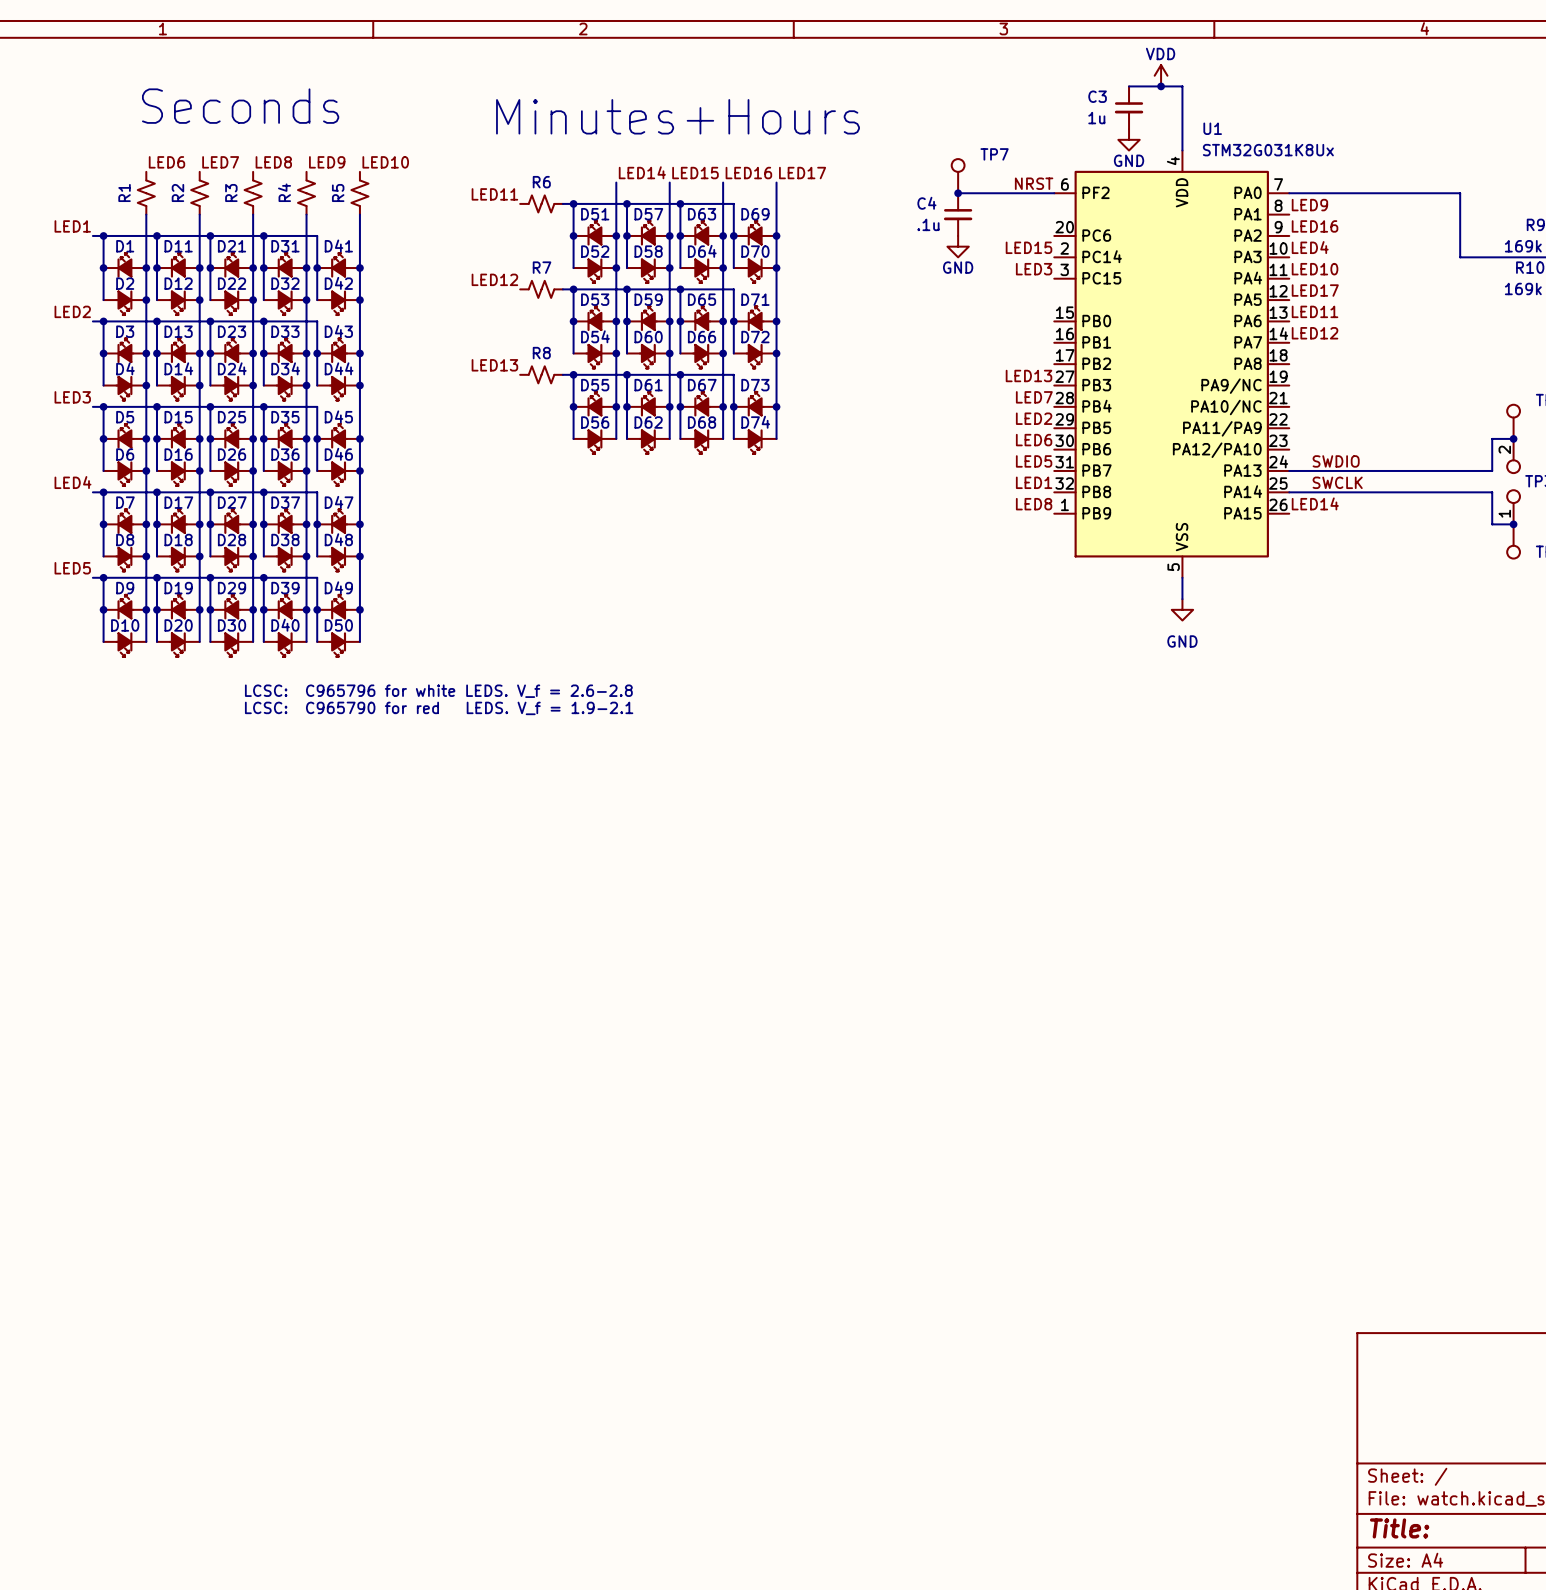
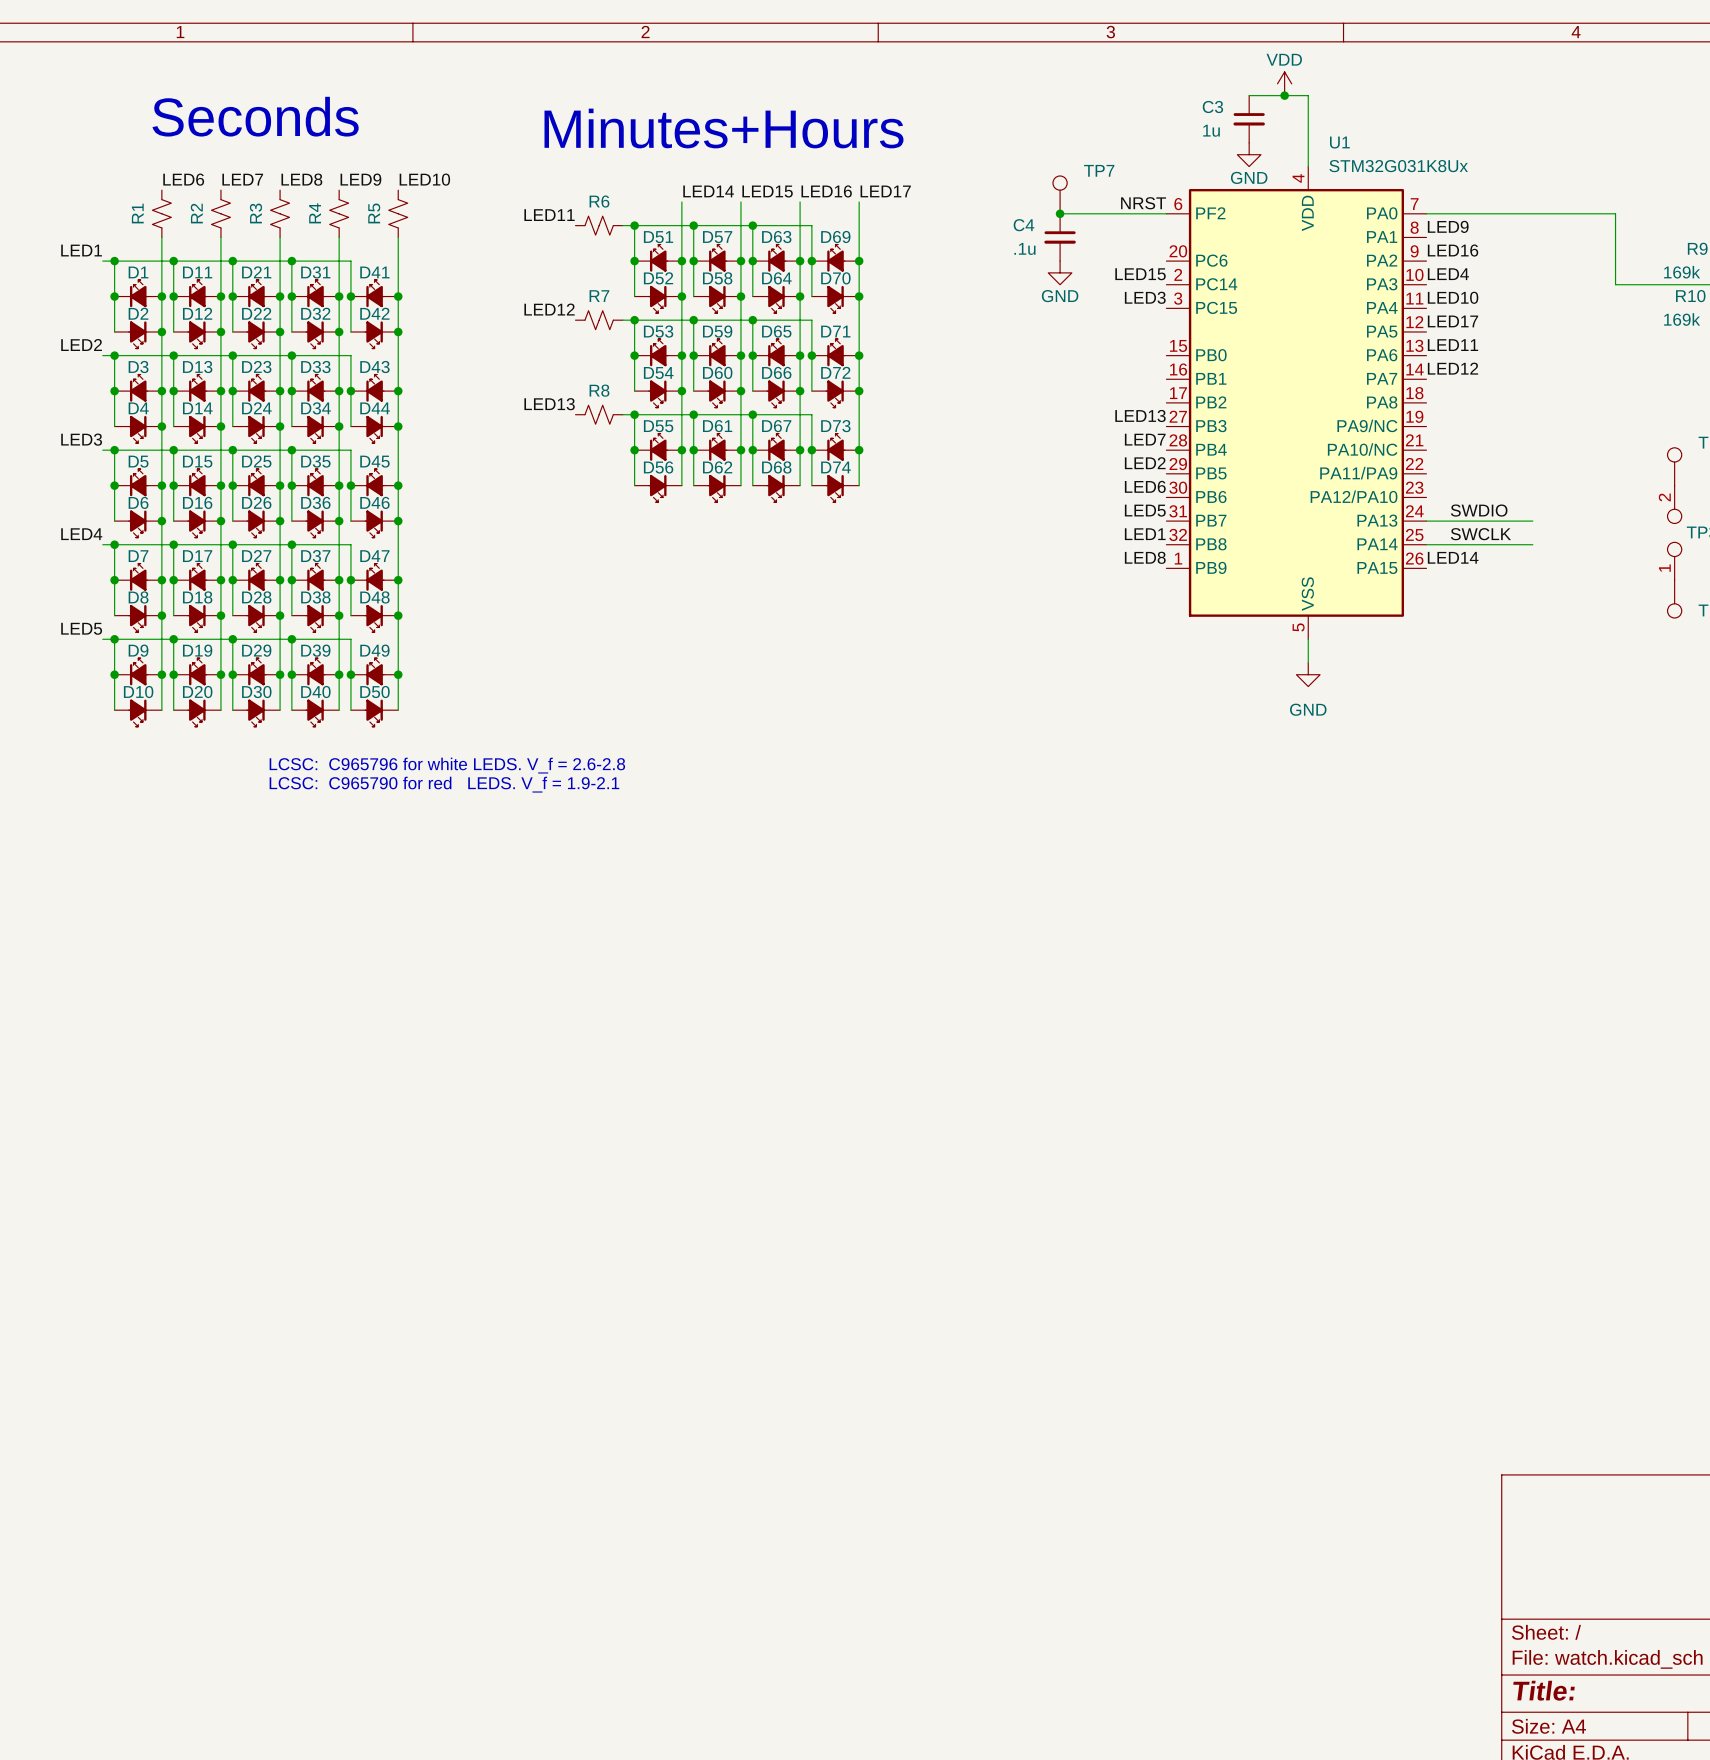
wire: (1513, 438) (1492, 438) (1492, 470) (1385, 470) -> none
junction: (1513, 438) -> none
wire: (1385, 492) (1492, 492) (1492, 524) (1513, 524) -> none
junction: (1513, 524) -> none

